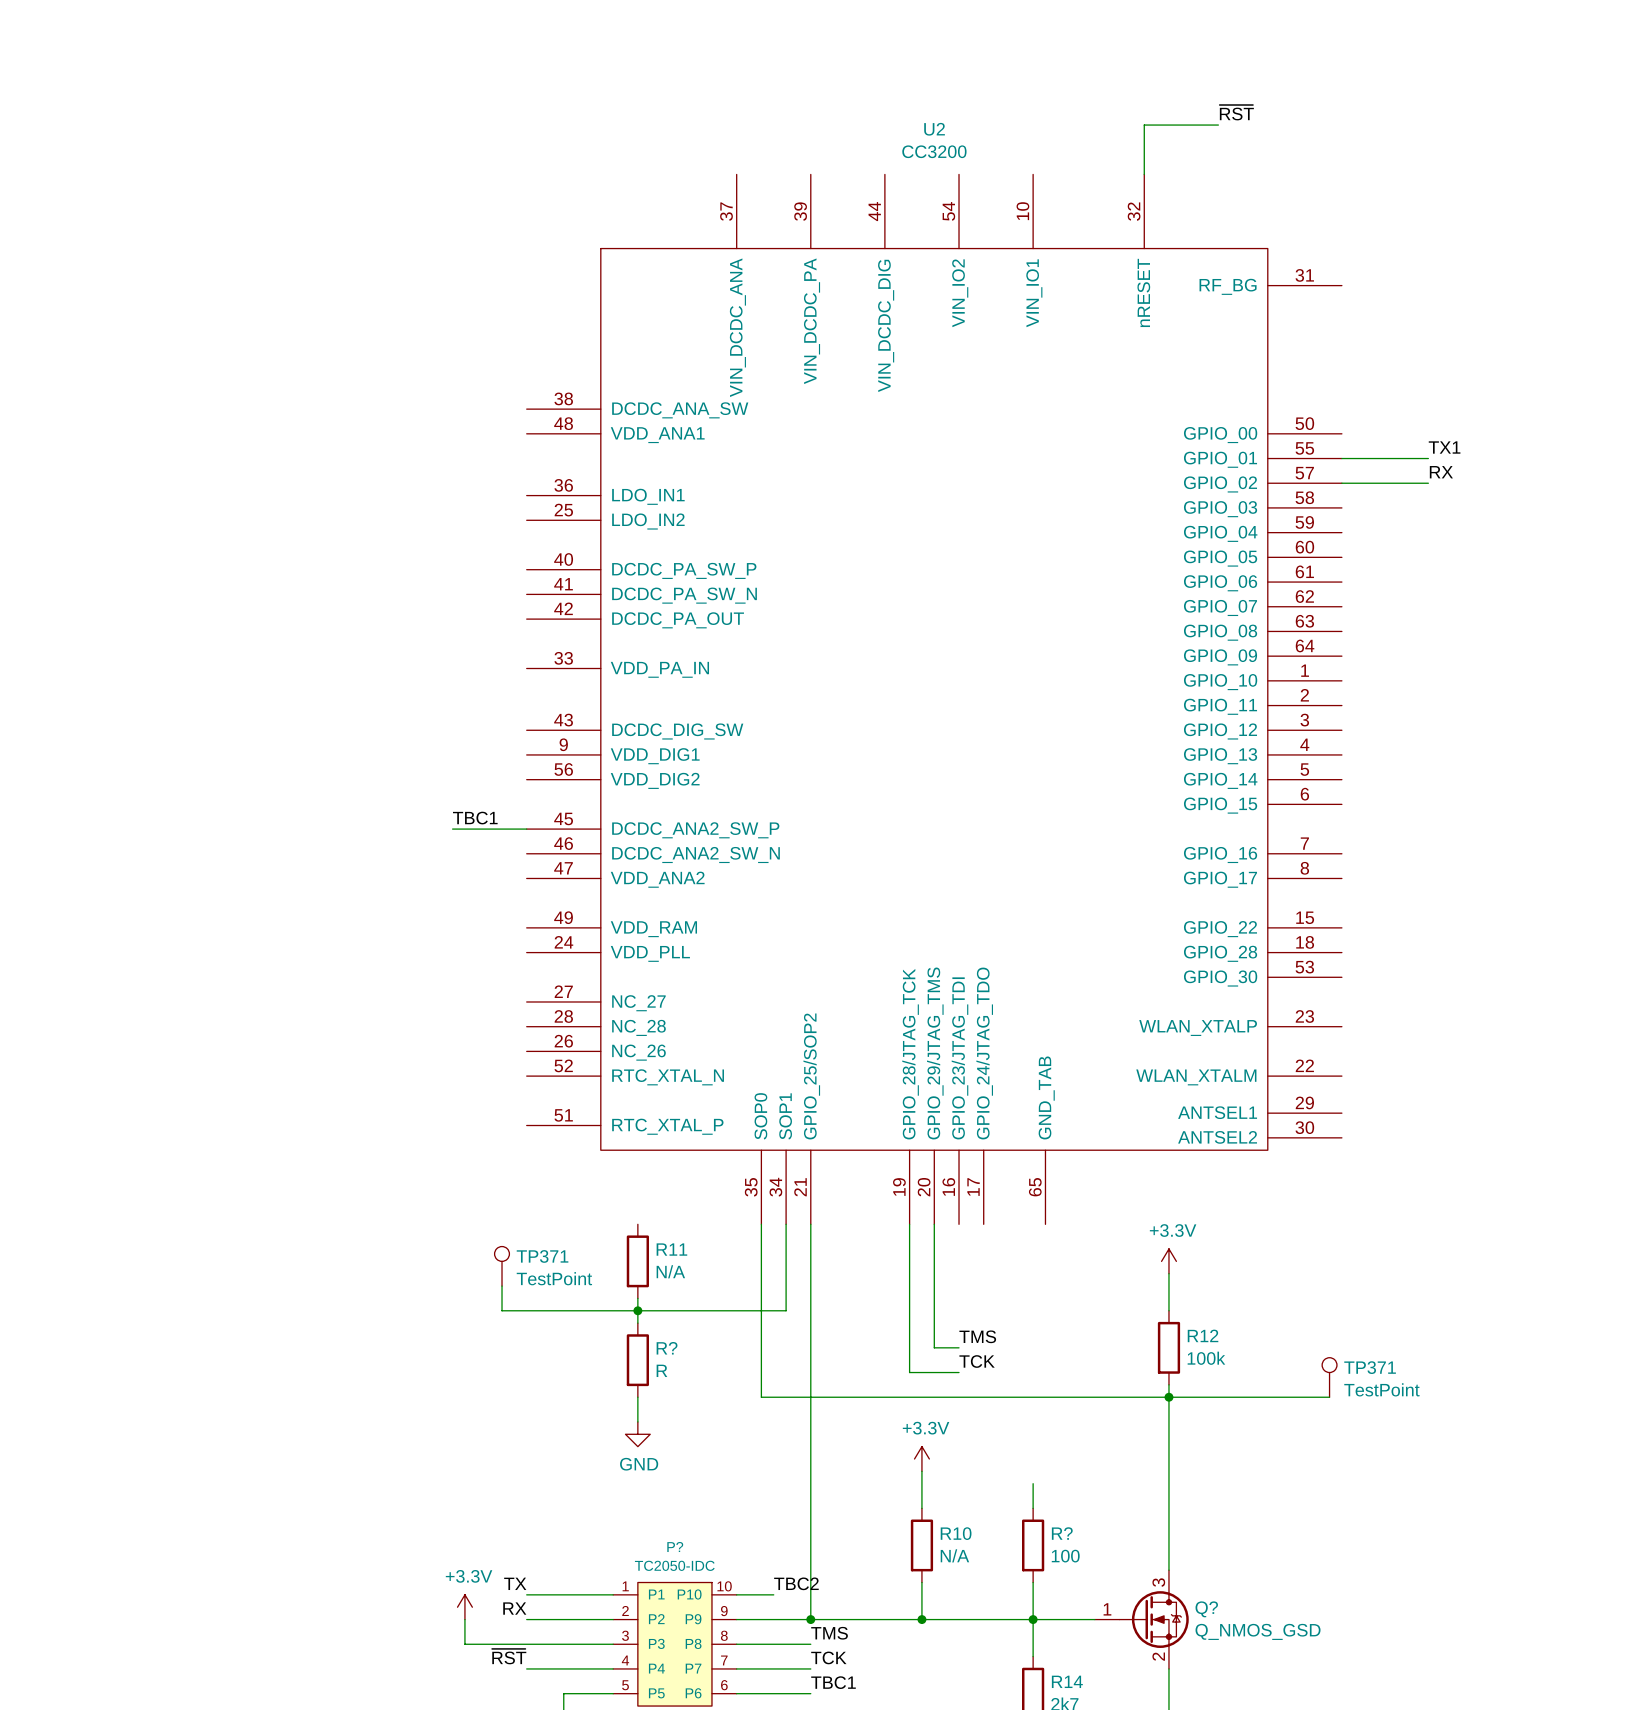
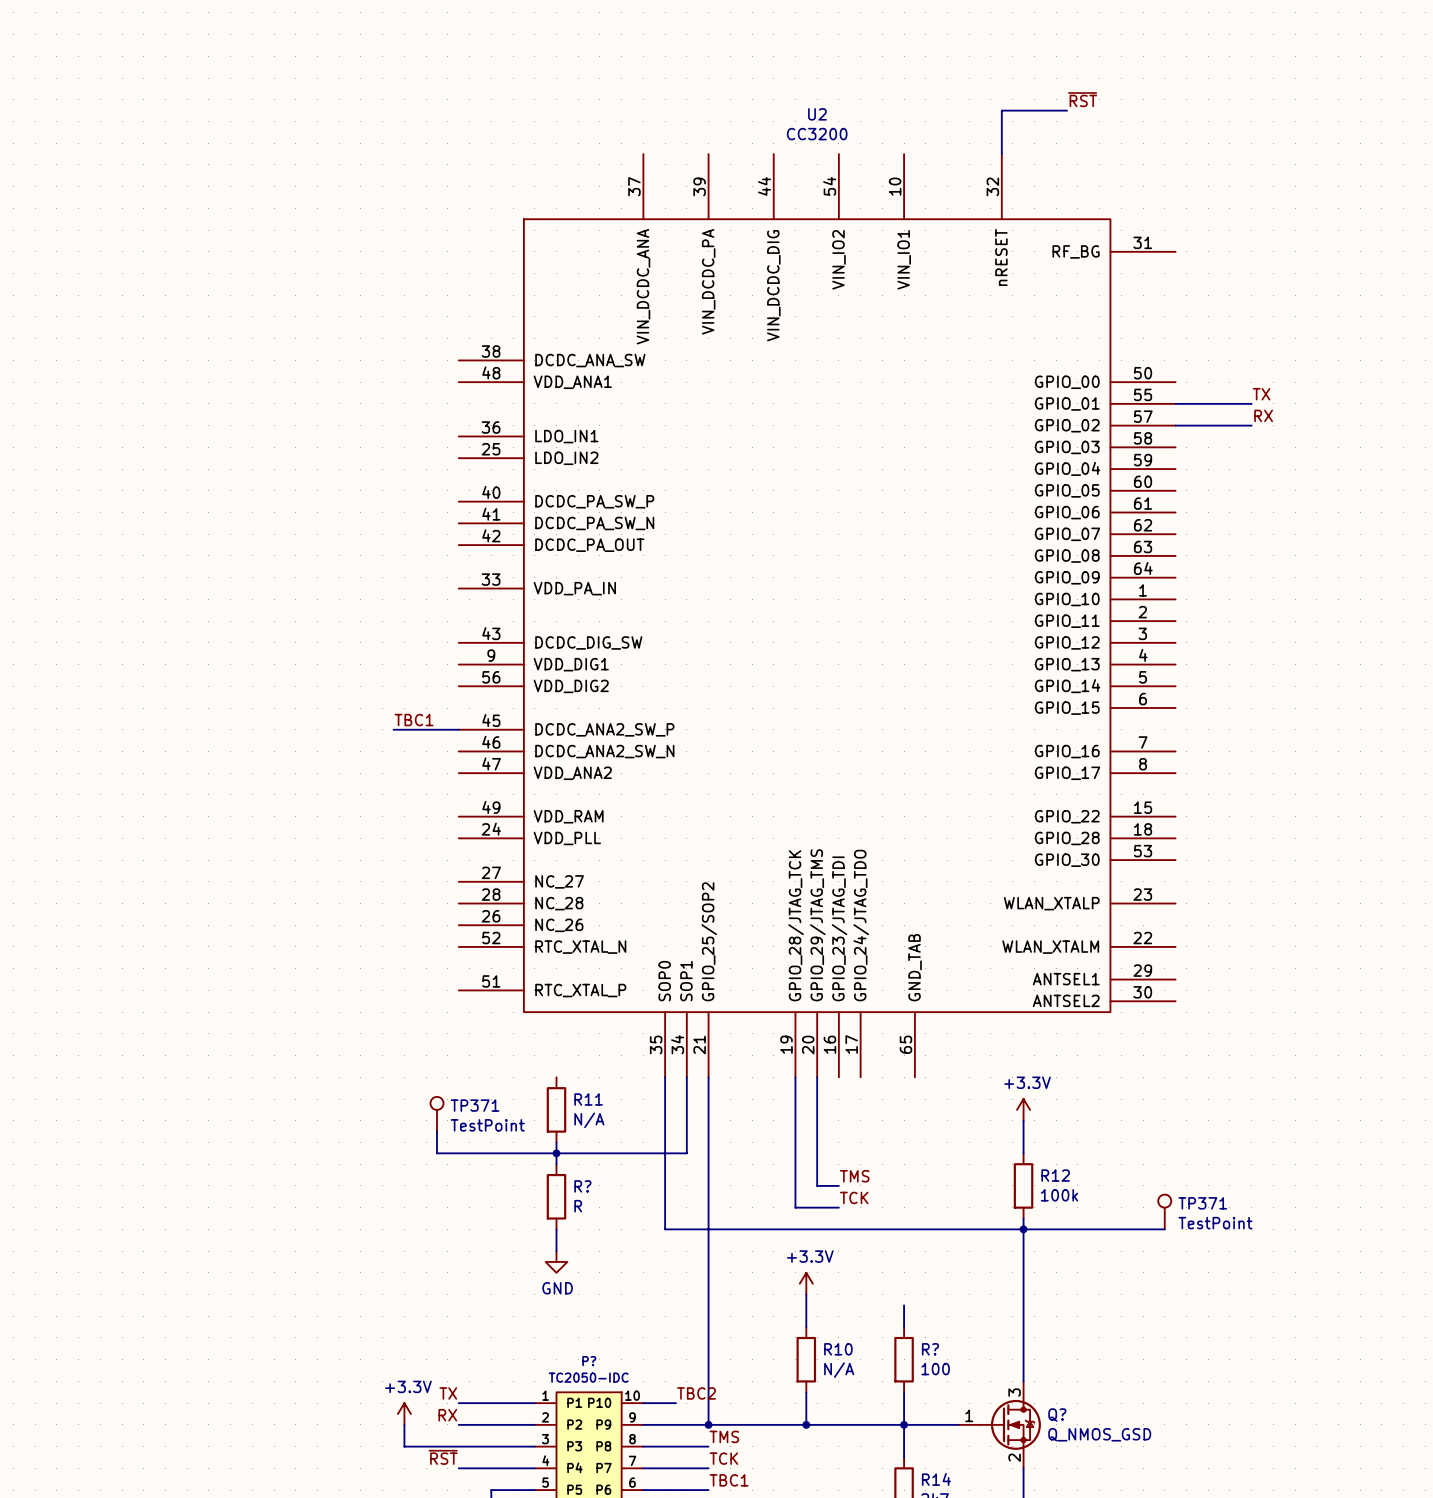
label: TX1 (1444, 447) -> TX (1261, 394)

